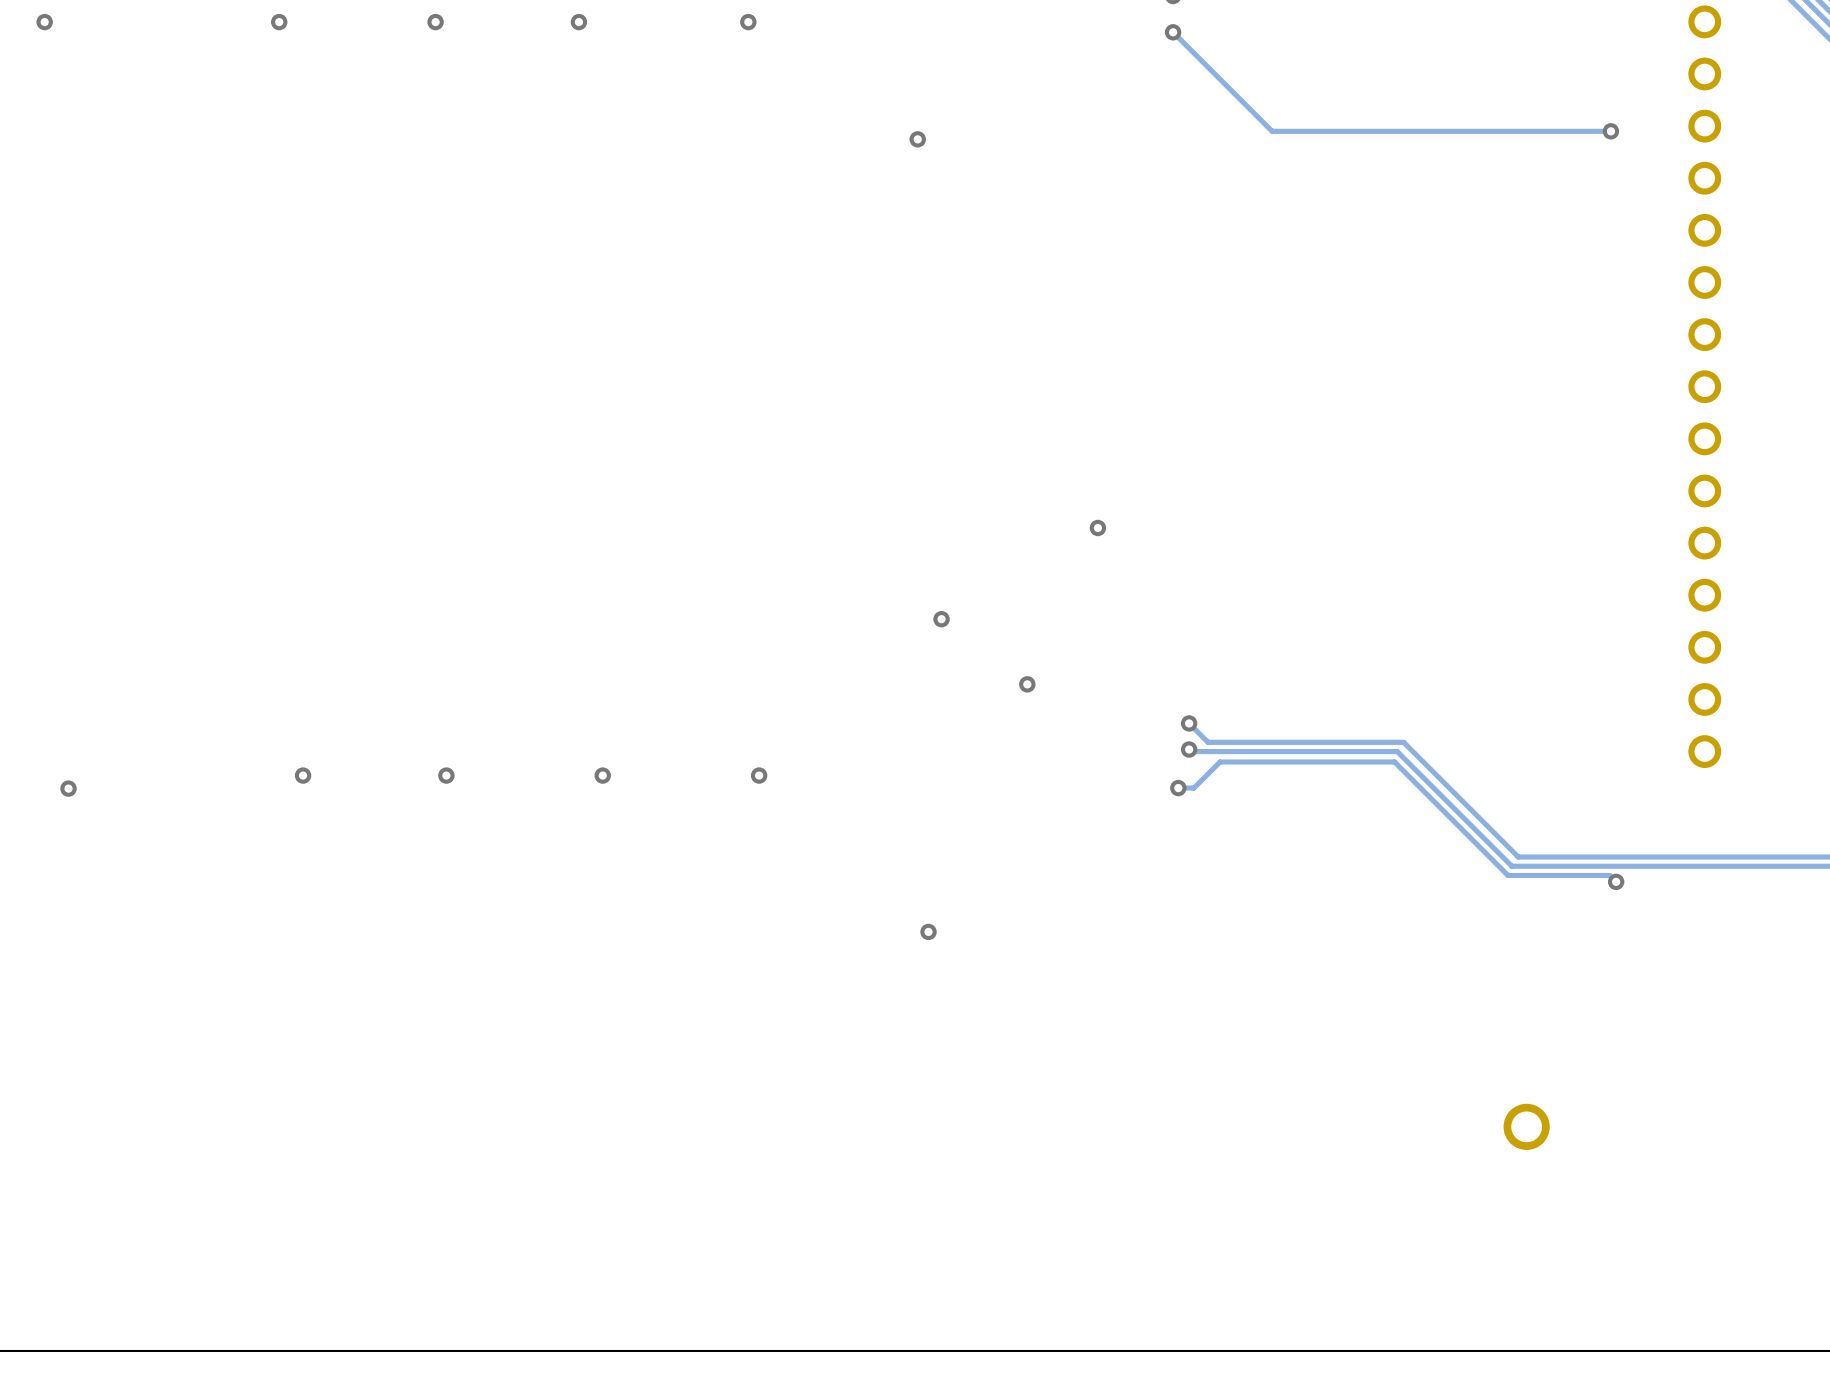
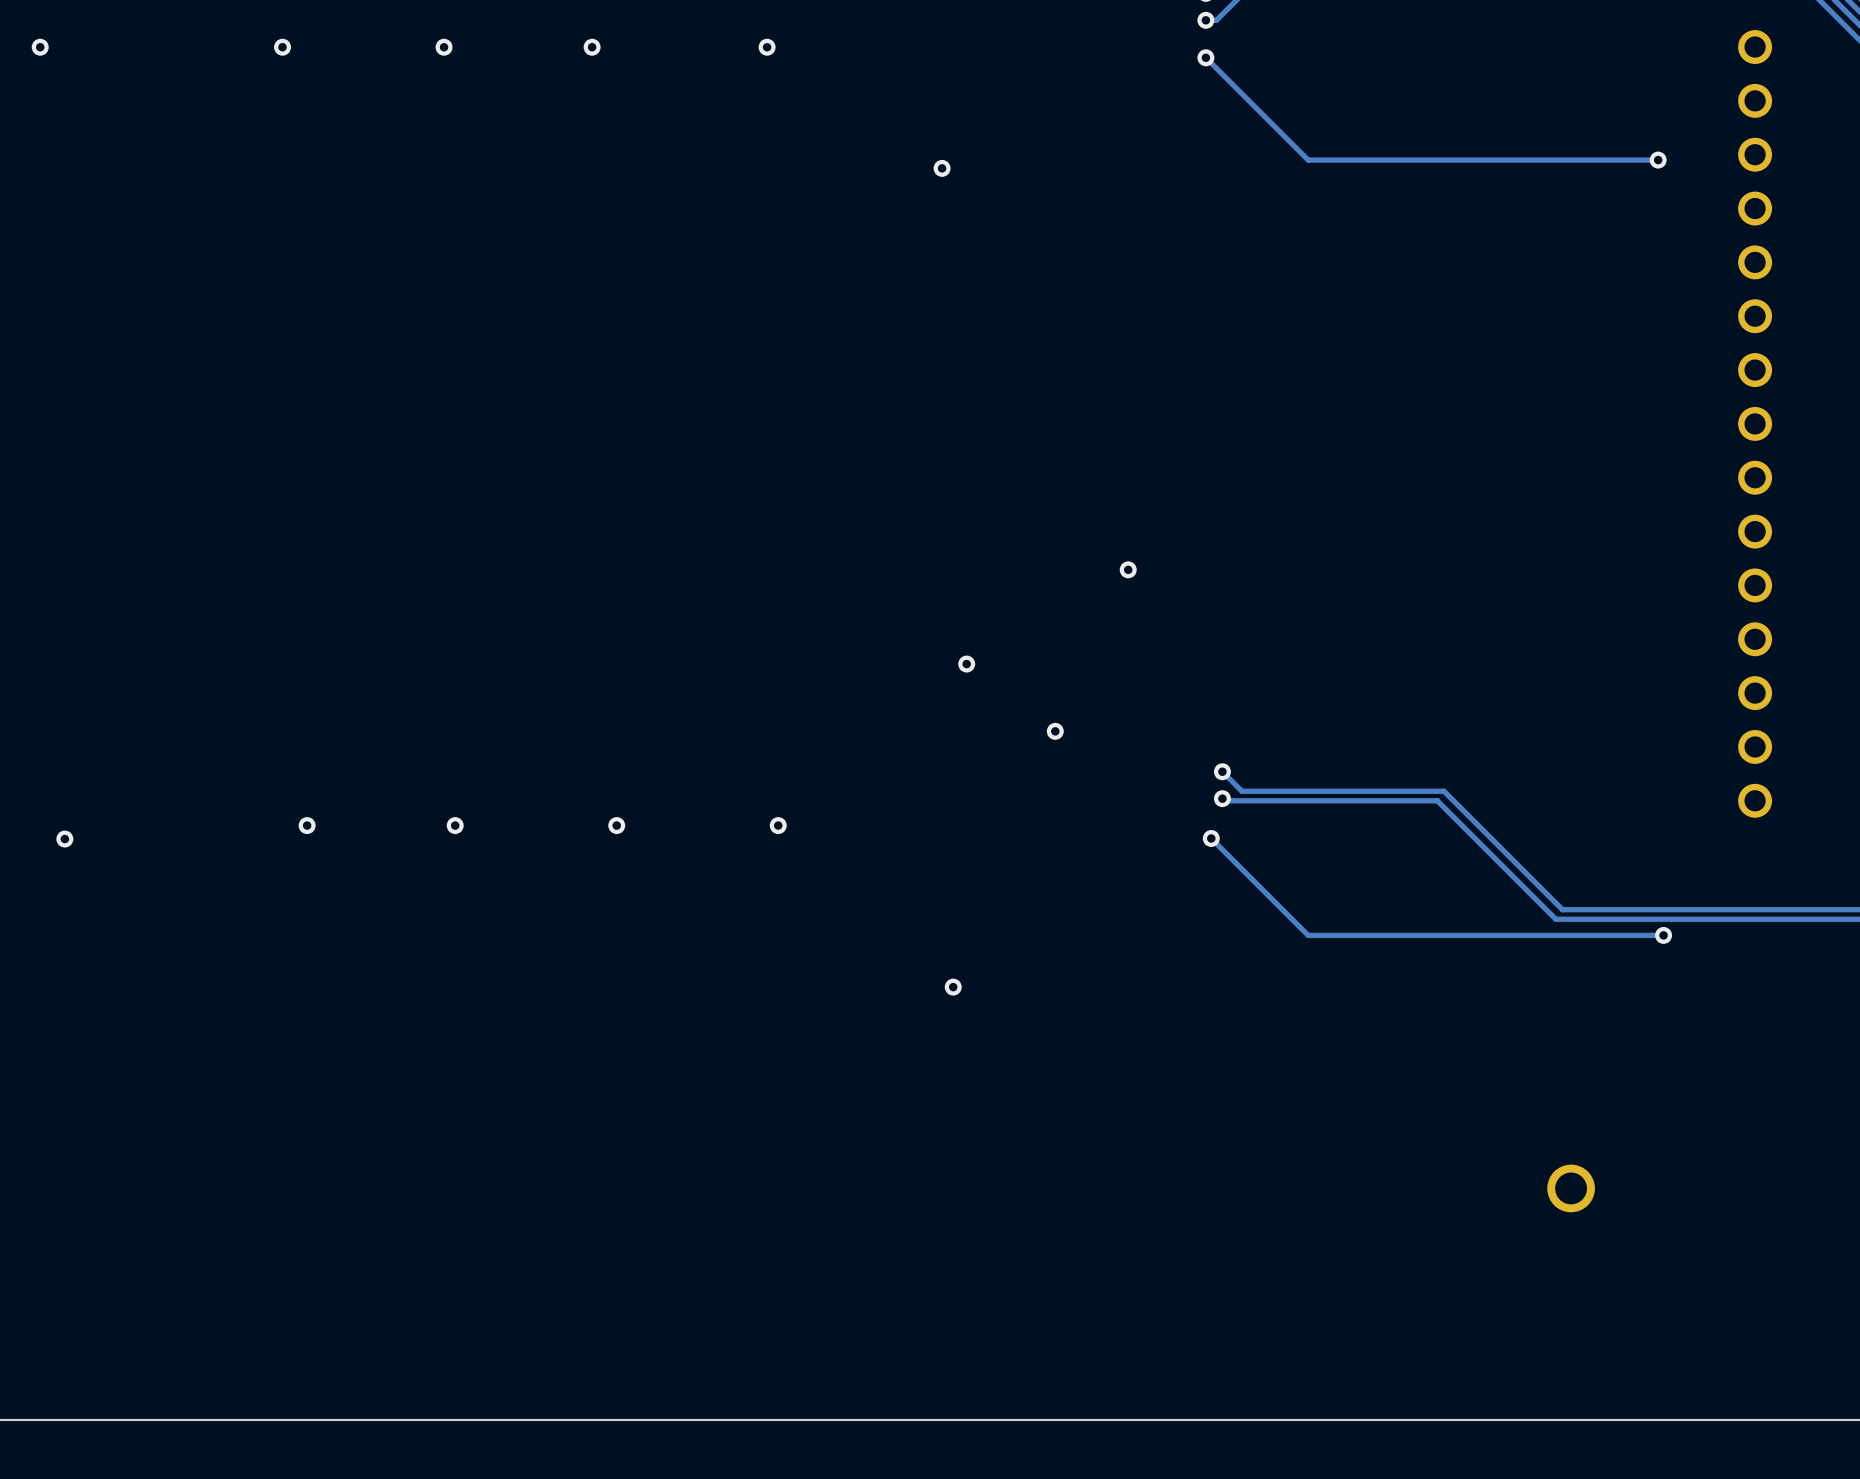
track: (1178, 788) (1193, 788) (1220, 762) (1394, 762) (1508, 875) (1609, 875) (1616, 881) -> (1211, 838) (1308, 935) (1663, 935)

